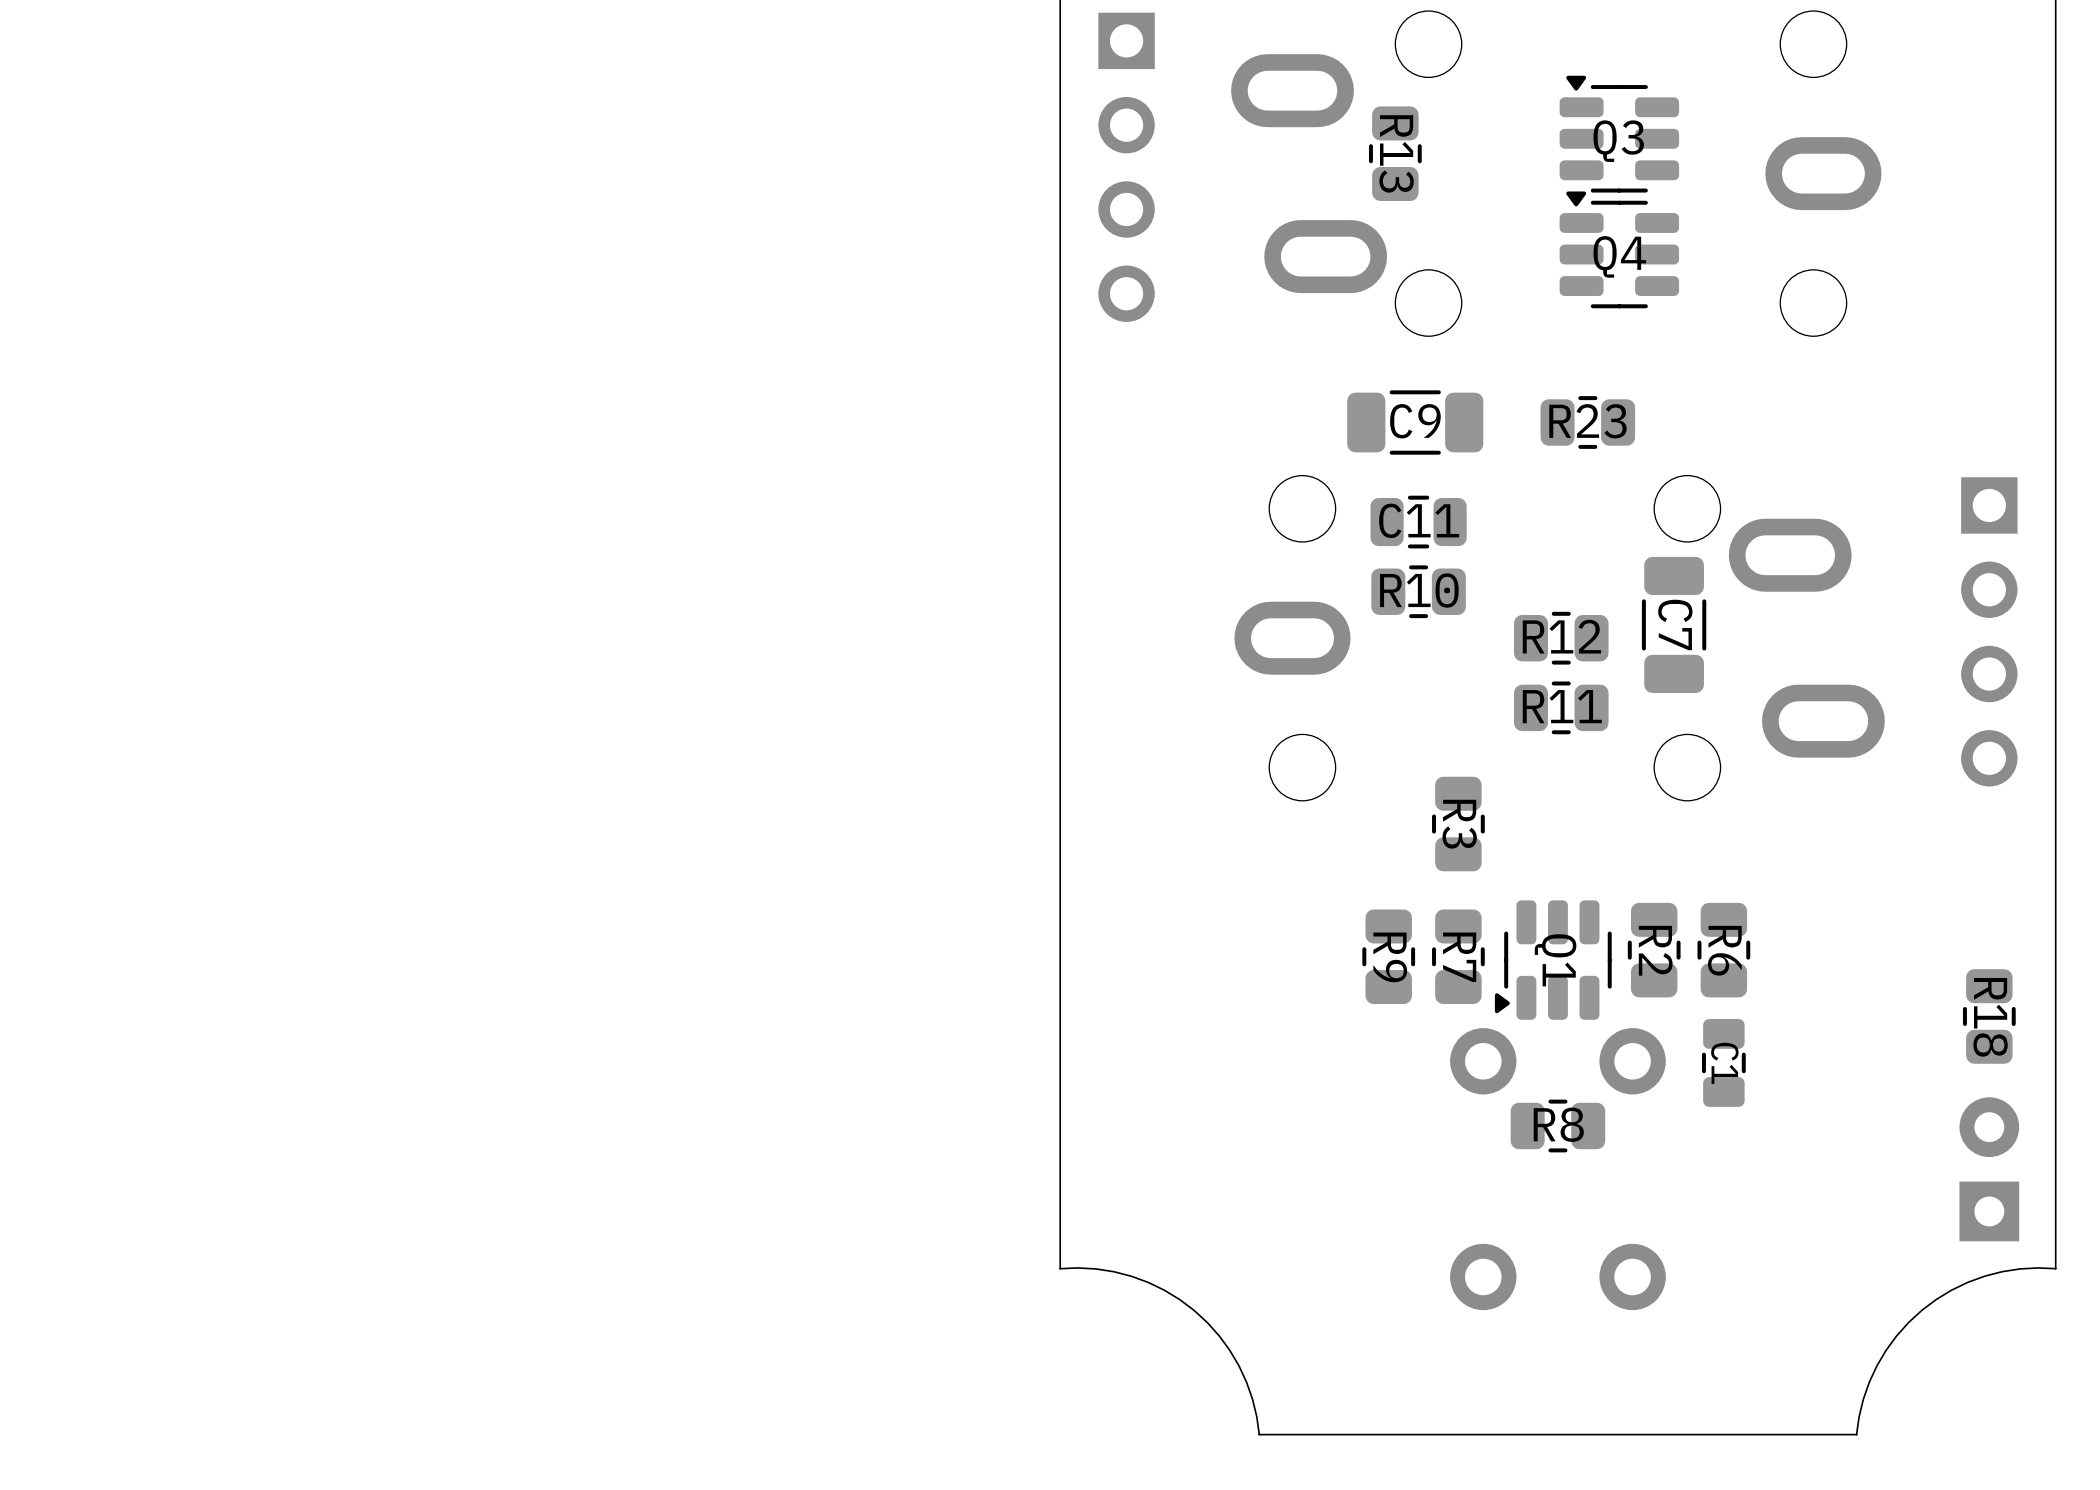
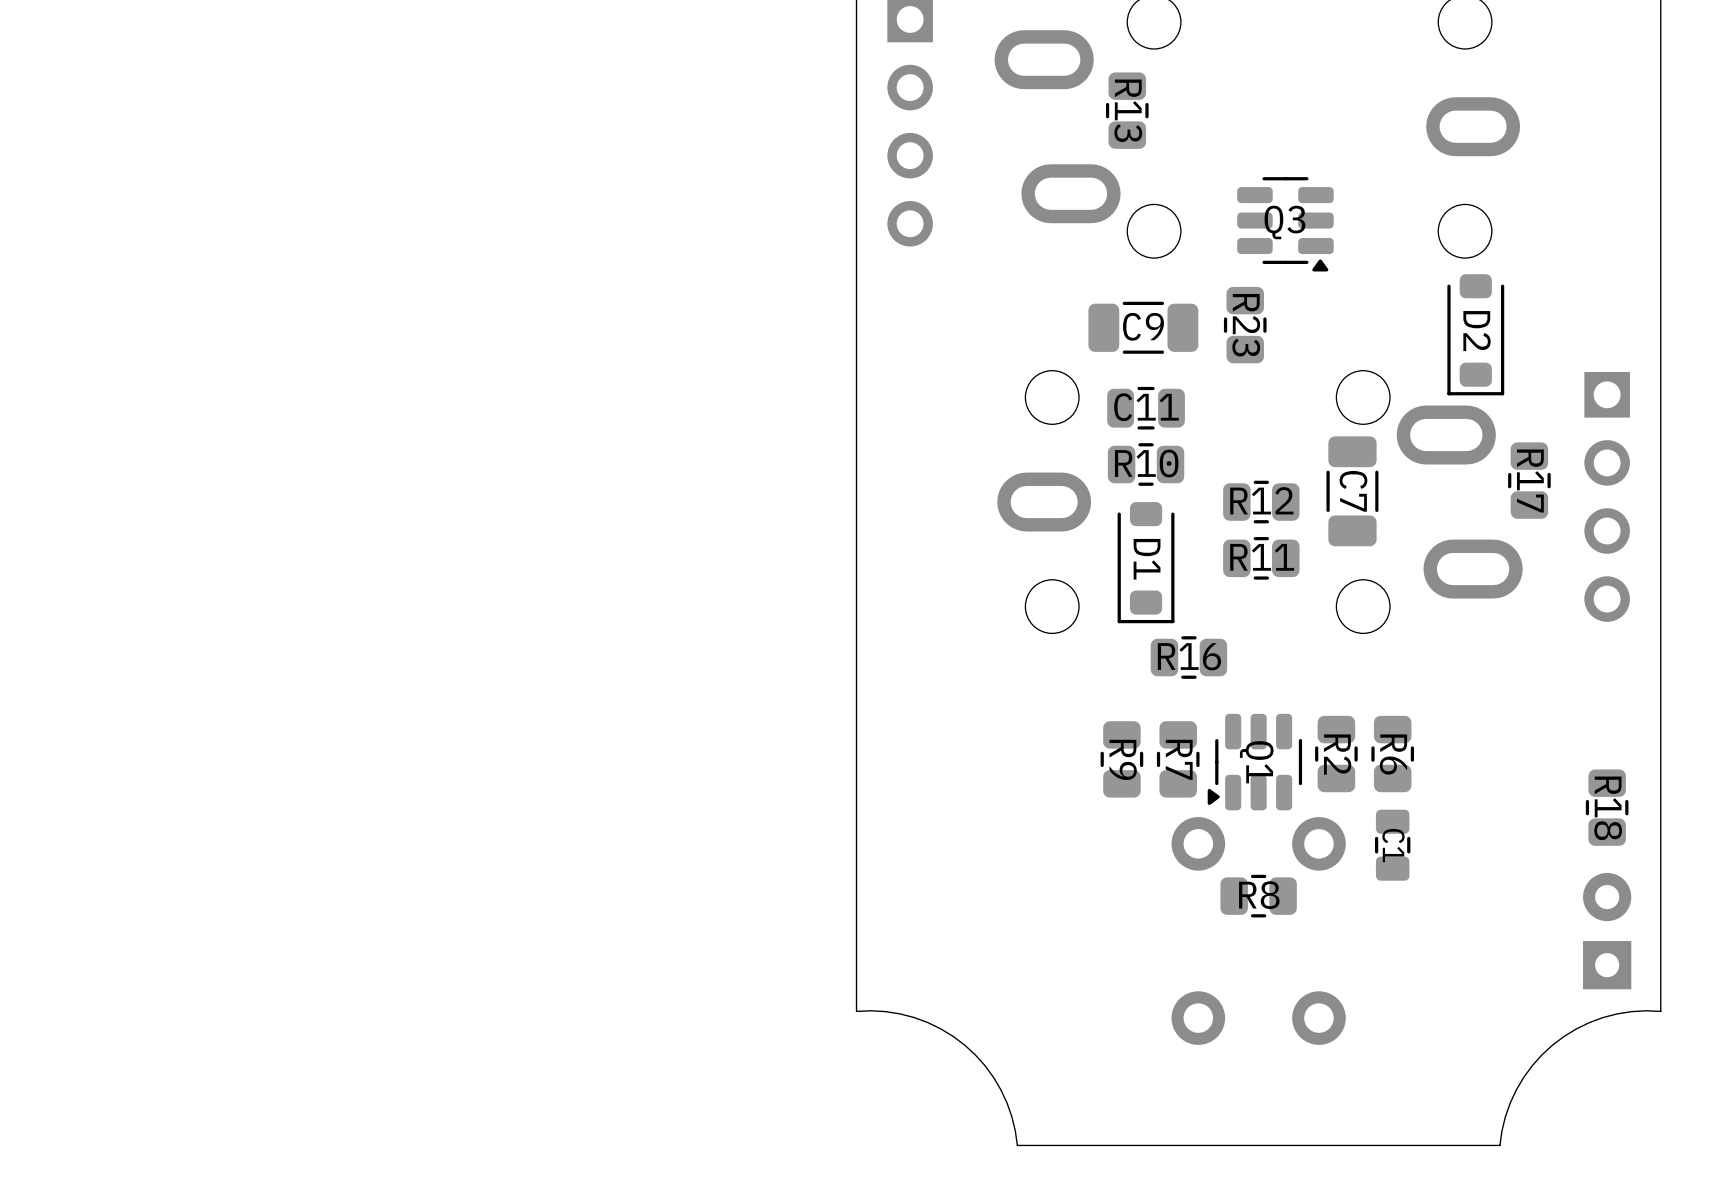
Q3 rotation: 0° (1619, 134) -> 180° (1285, 224)
Q3 position: (1619, 134) -> (1285, 224)
Q4: (1619, 249) -> none
R23 rotation: 0° (1587, 422) -> 90° clockwise (1245, 325)
D2: none -> (1475, 334)
R17: none -> (1529, 480)
D1: none -> (1146, 562)
R3: (1458, 824) -> none
R16: none -> (1188, 657)

